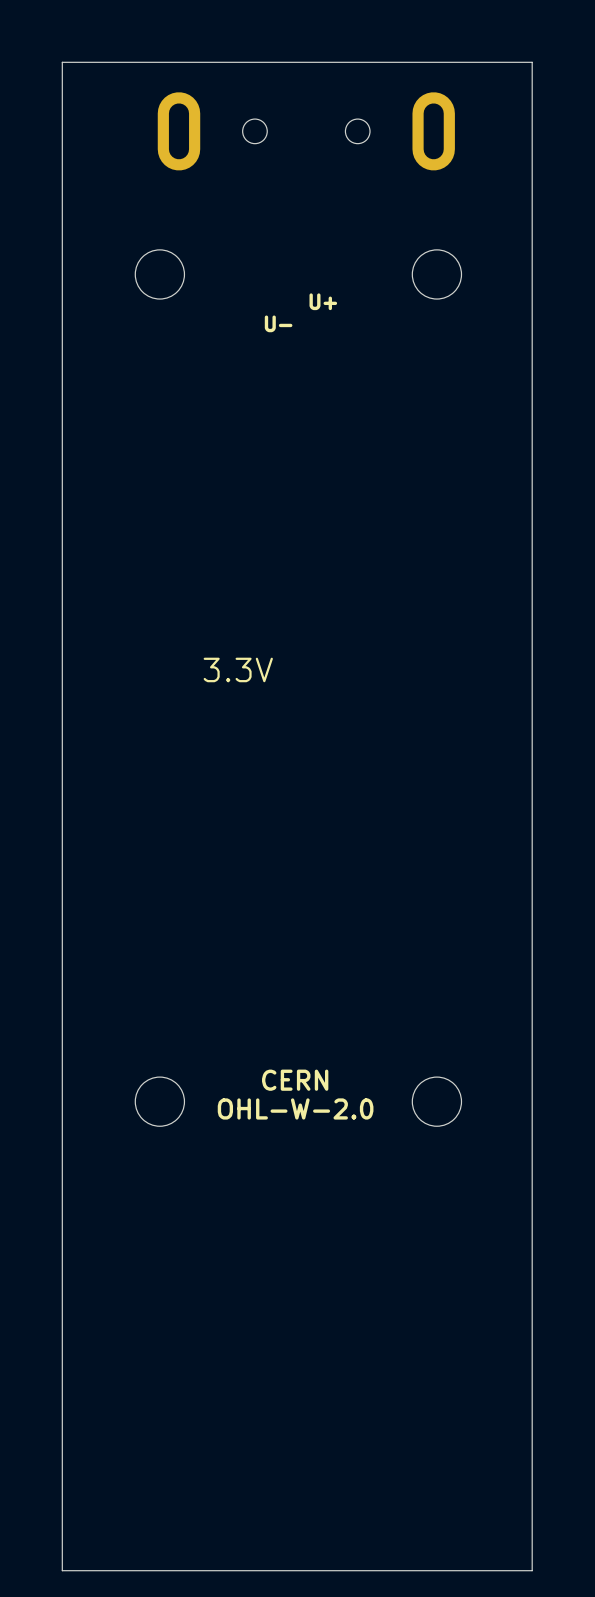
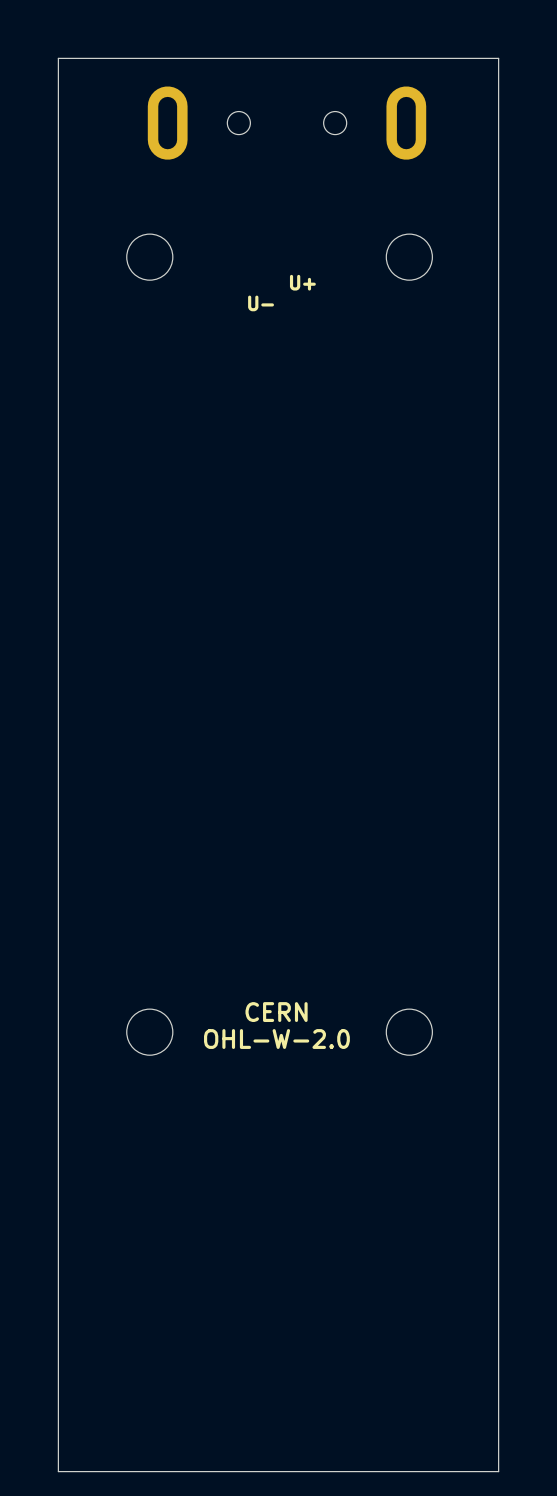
text: 3.3V (238, 669) -> none

